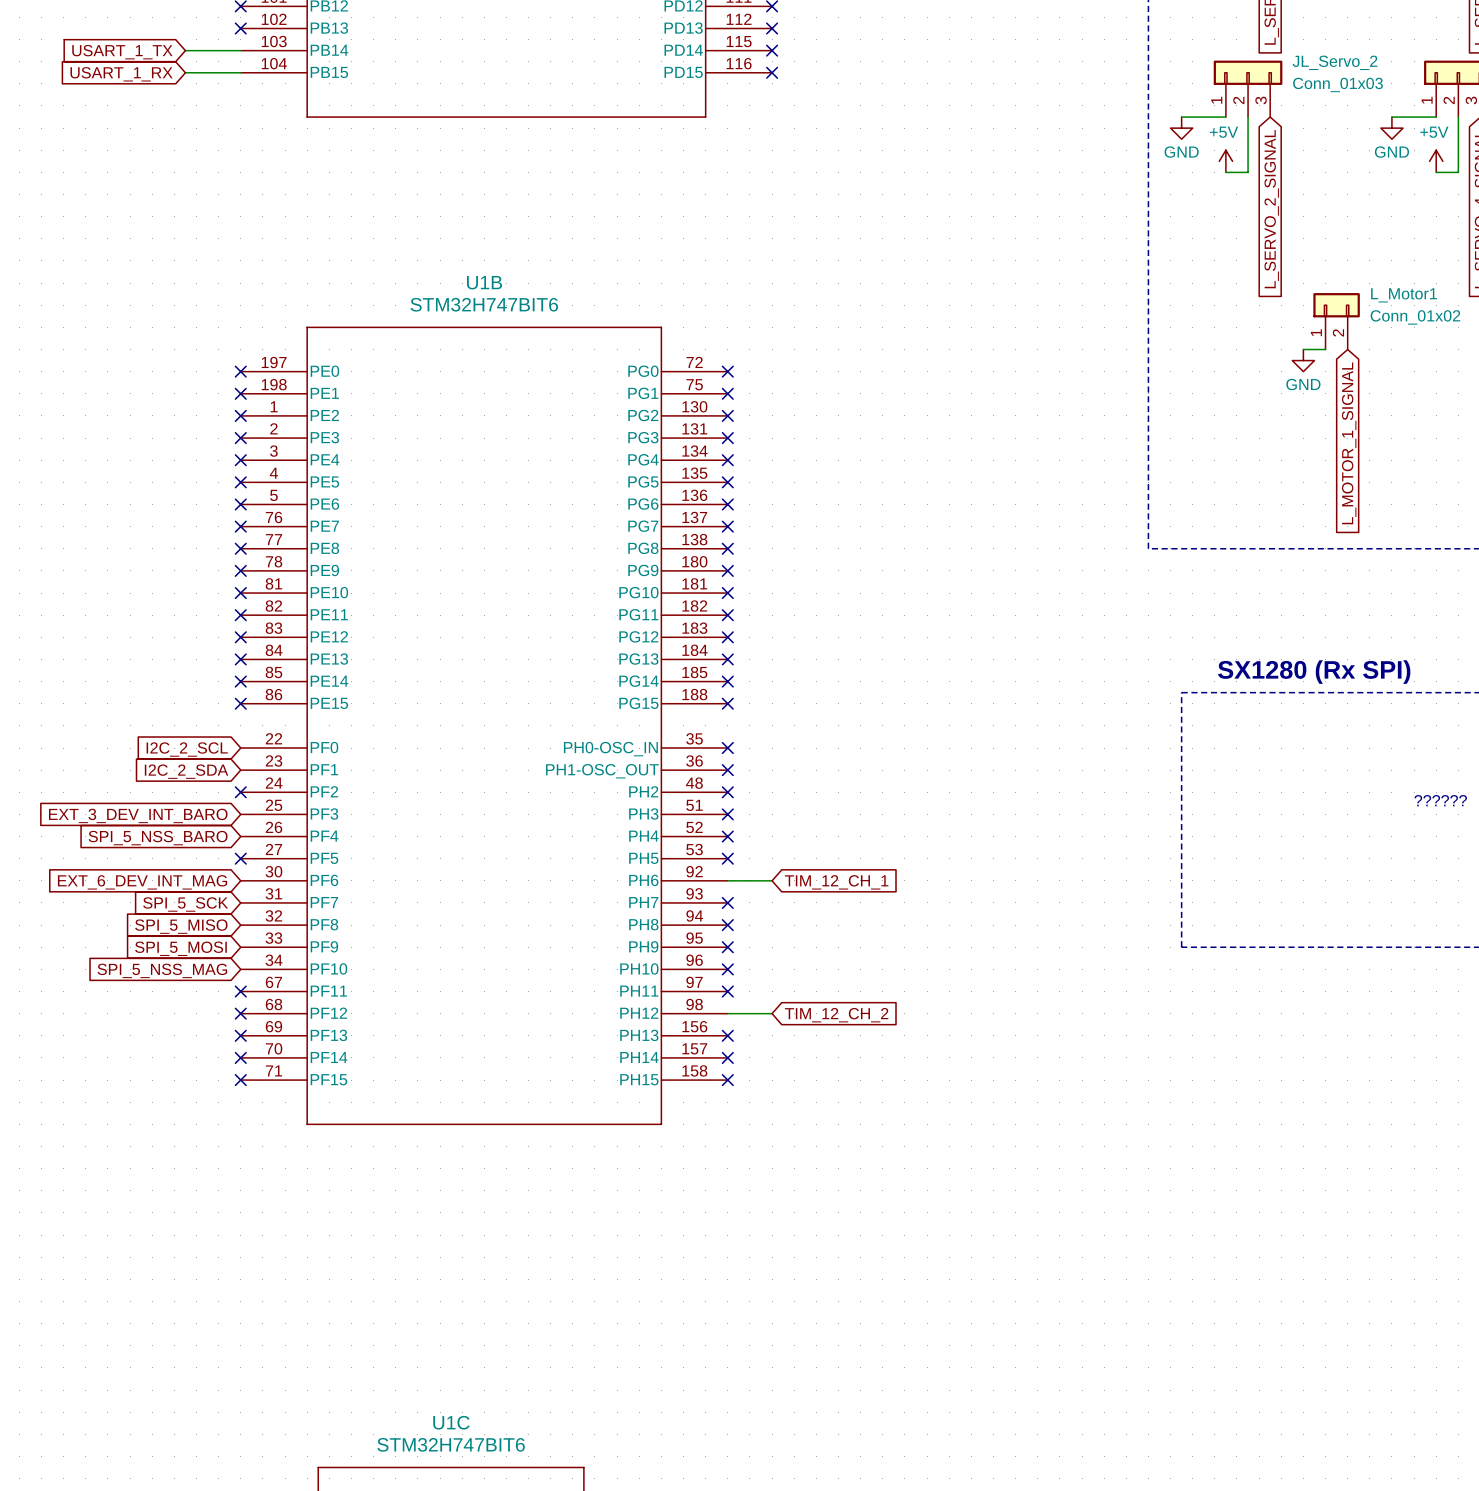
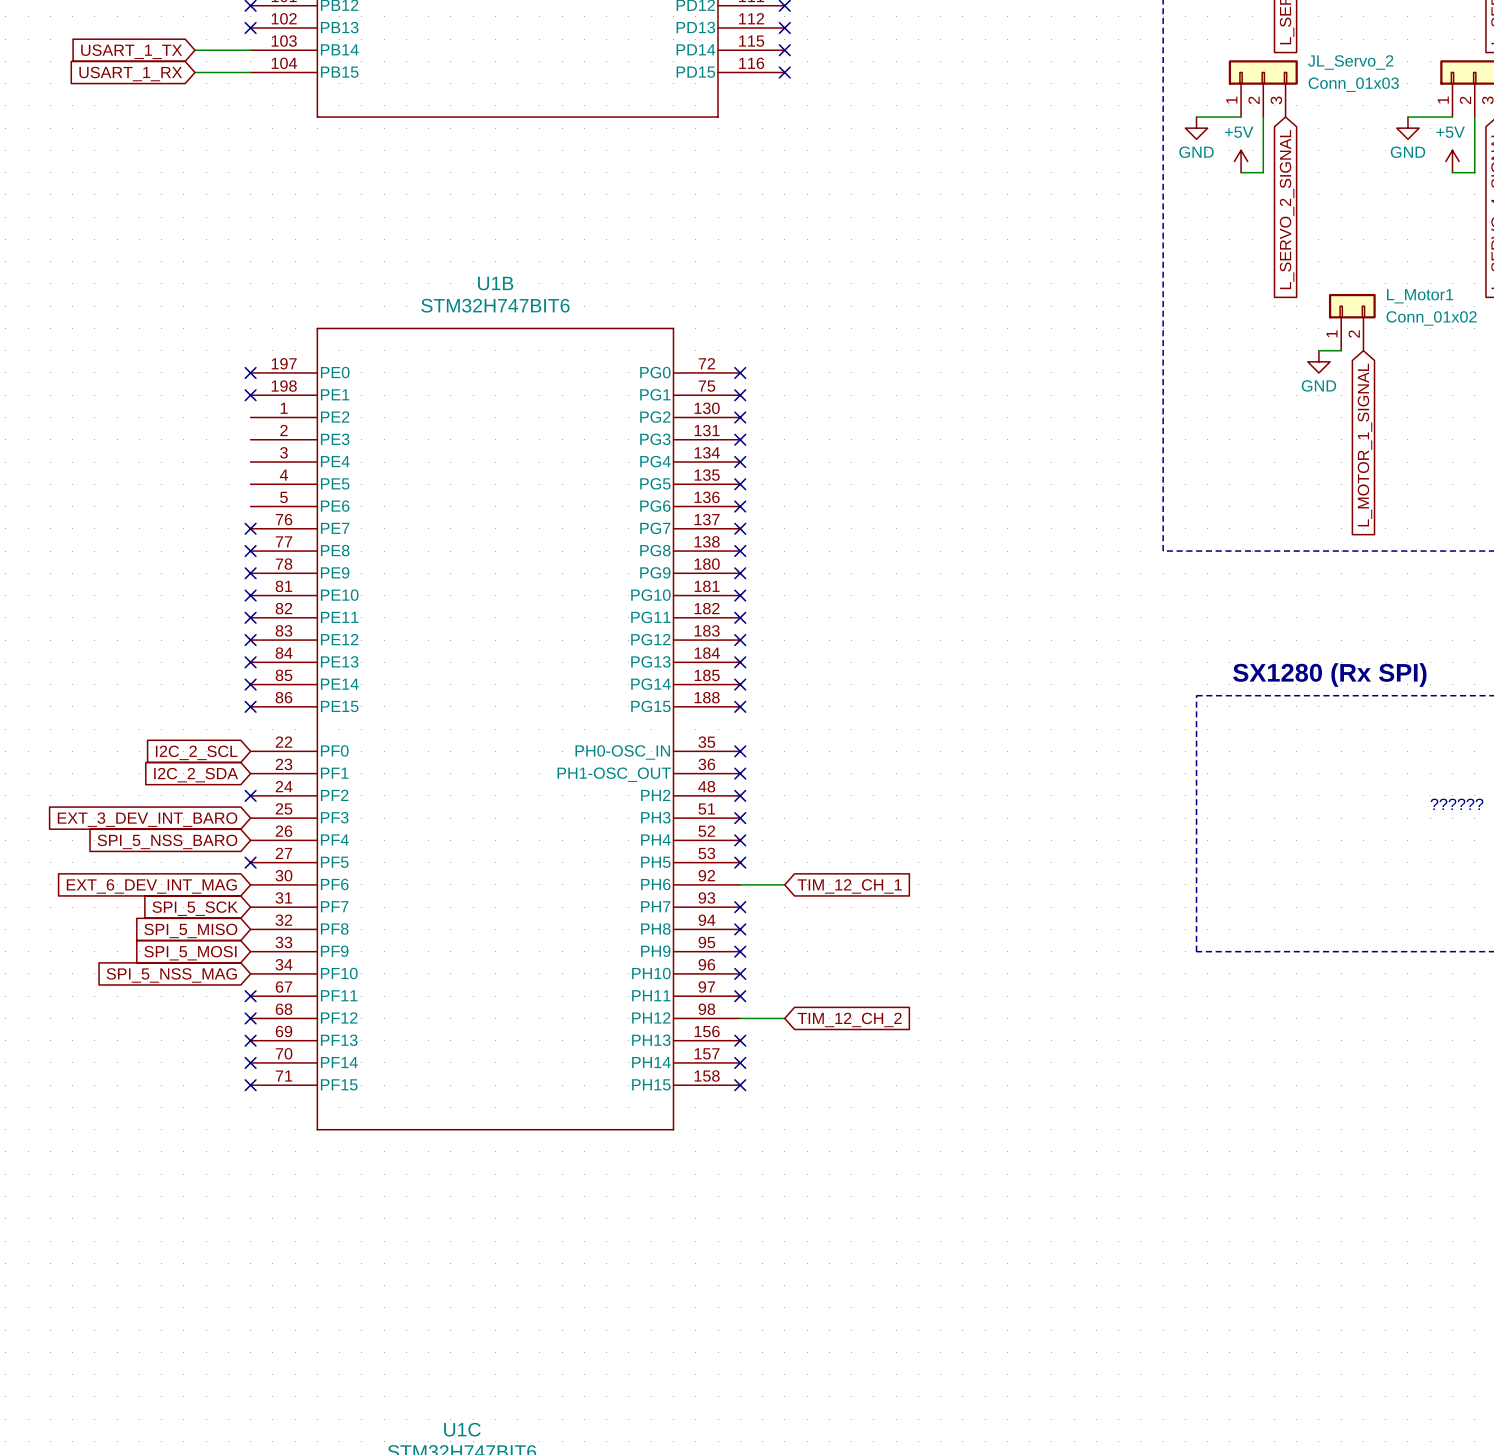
no-connect mark: (240, 415) -> none
no-connect mark: (240, 438) -> none
no-connect mark: (240, 460) -> none
no-connect mark: (240, 482) -> none
no-connect mark: (240, 504) -> none

